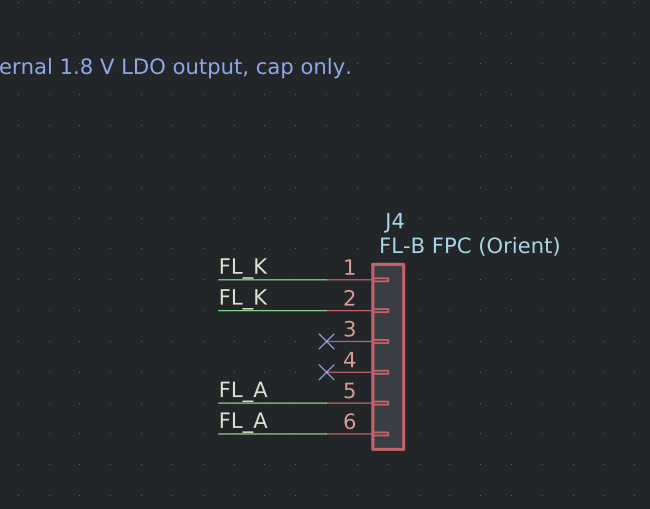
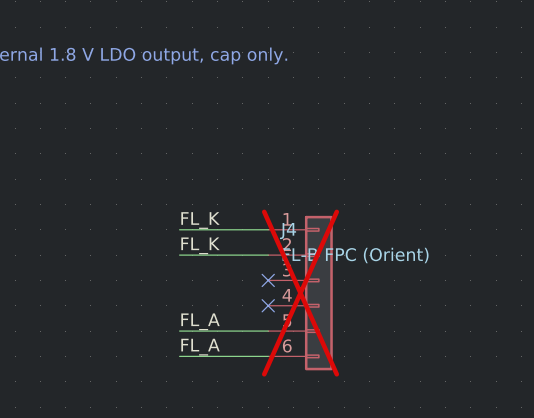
J4 name position: J4 (393, 222) -> J4 (288, 231)
J4 value position: FL-B FPC (Orient) (469, 246) -> FL-B FPC (Orient) (355, 255)
J4 do-not-place cross: none -> (300, 293)

